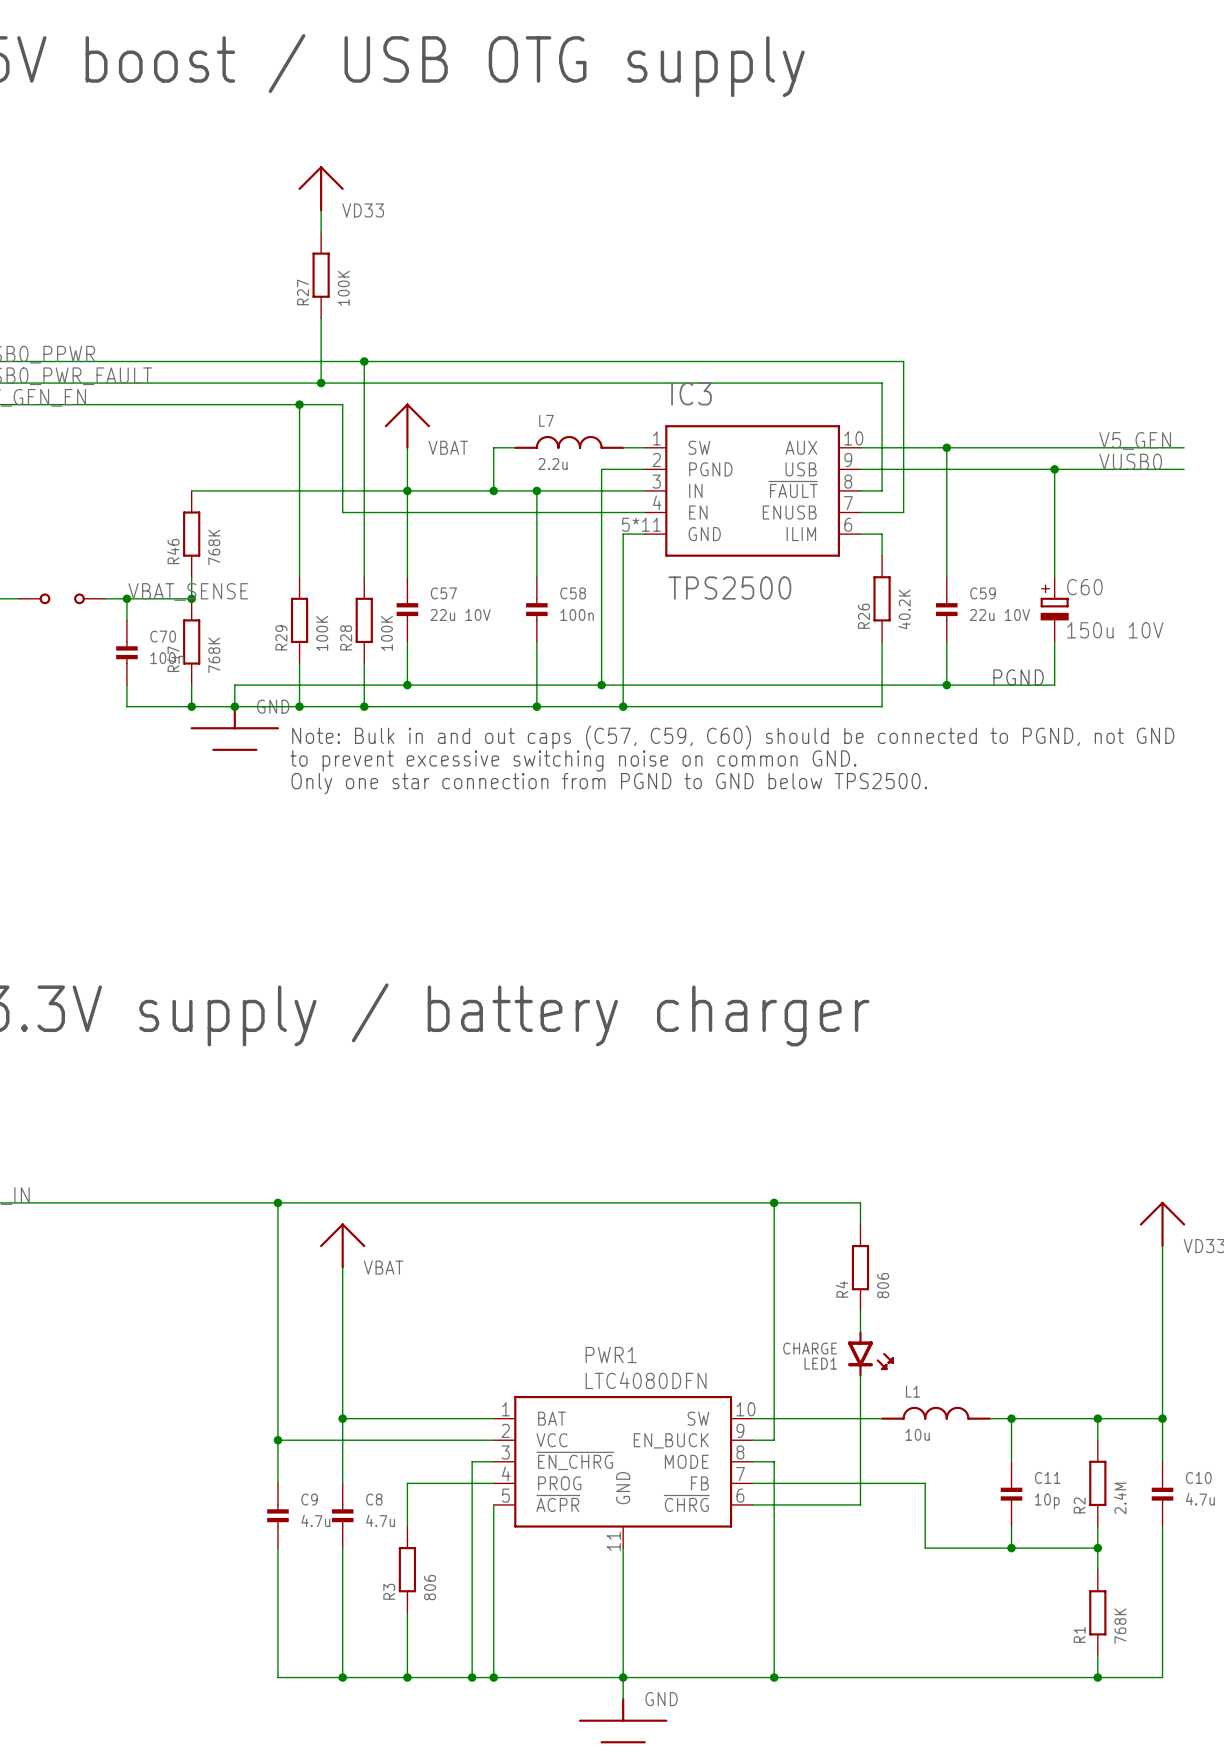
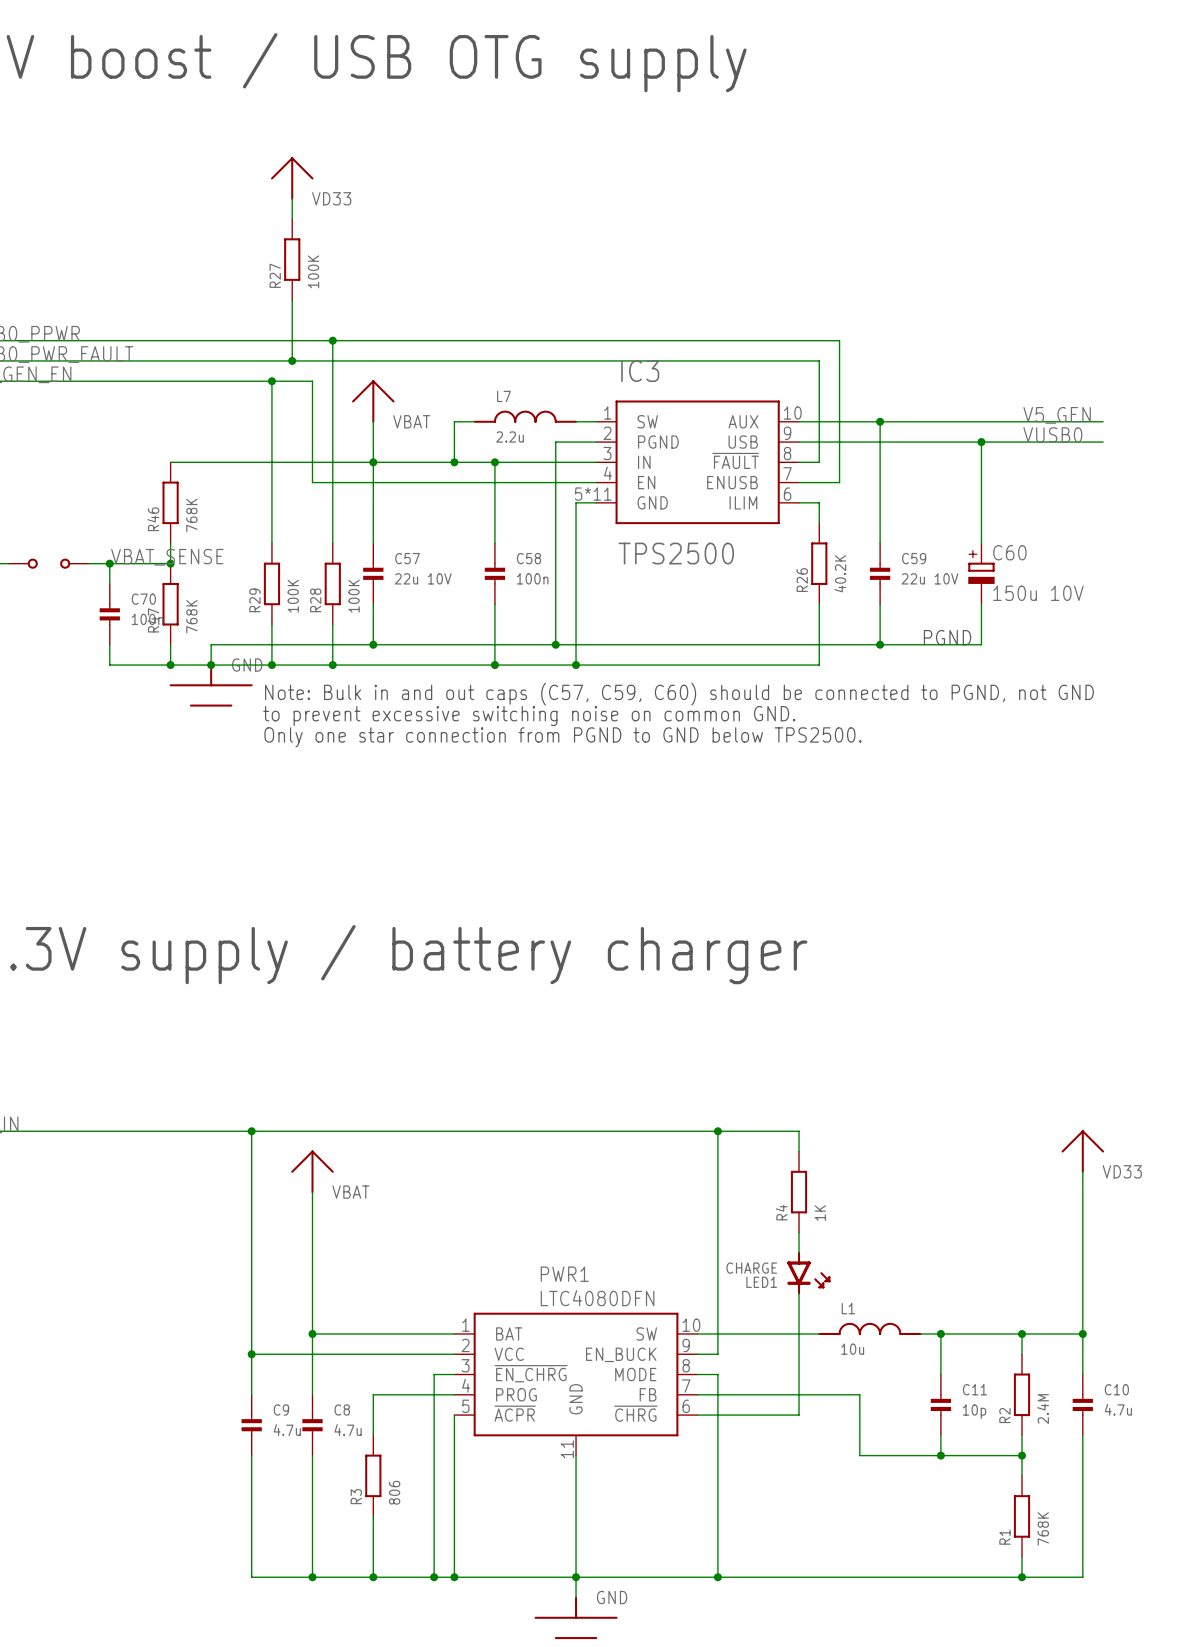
R4 value: 806 (883, 1285) -> 1K (820, 1213)

